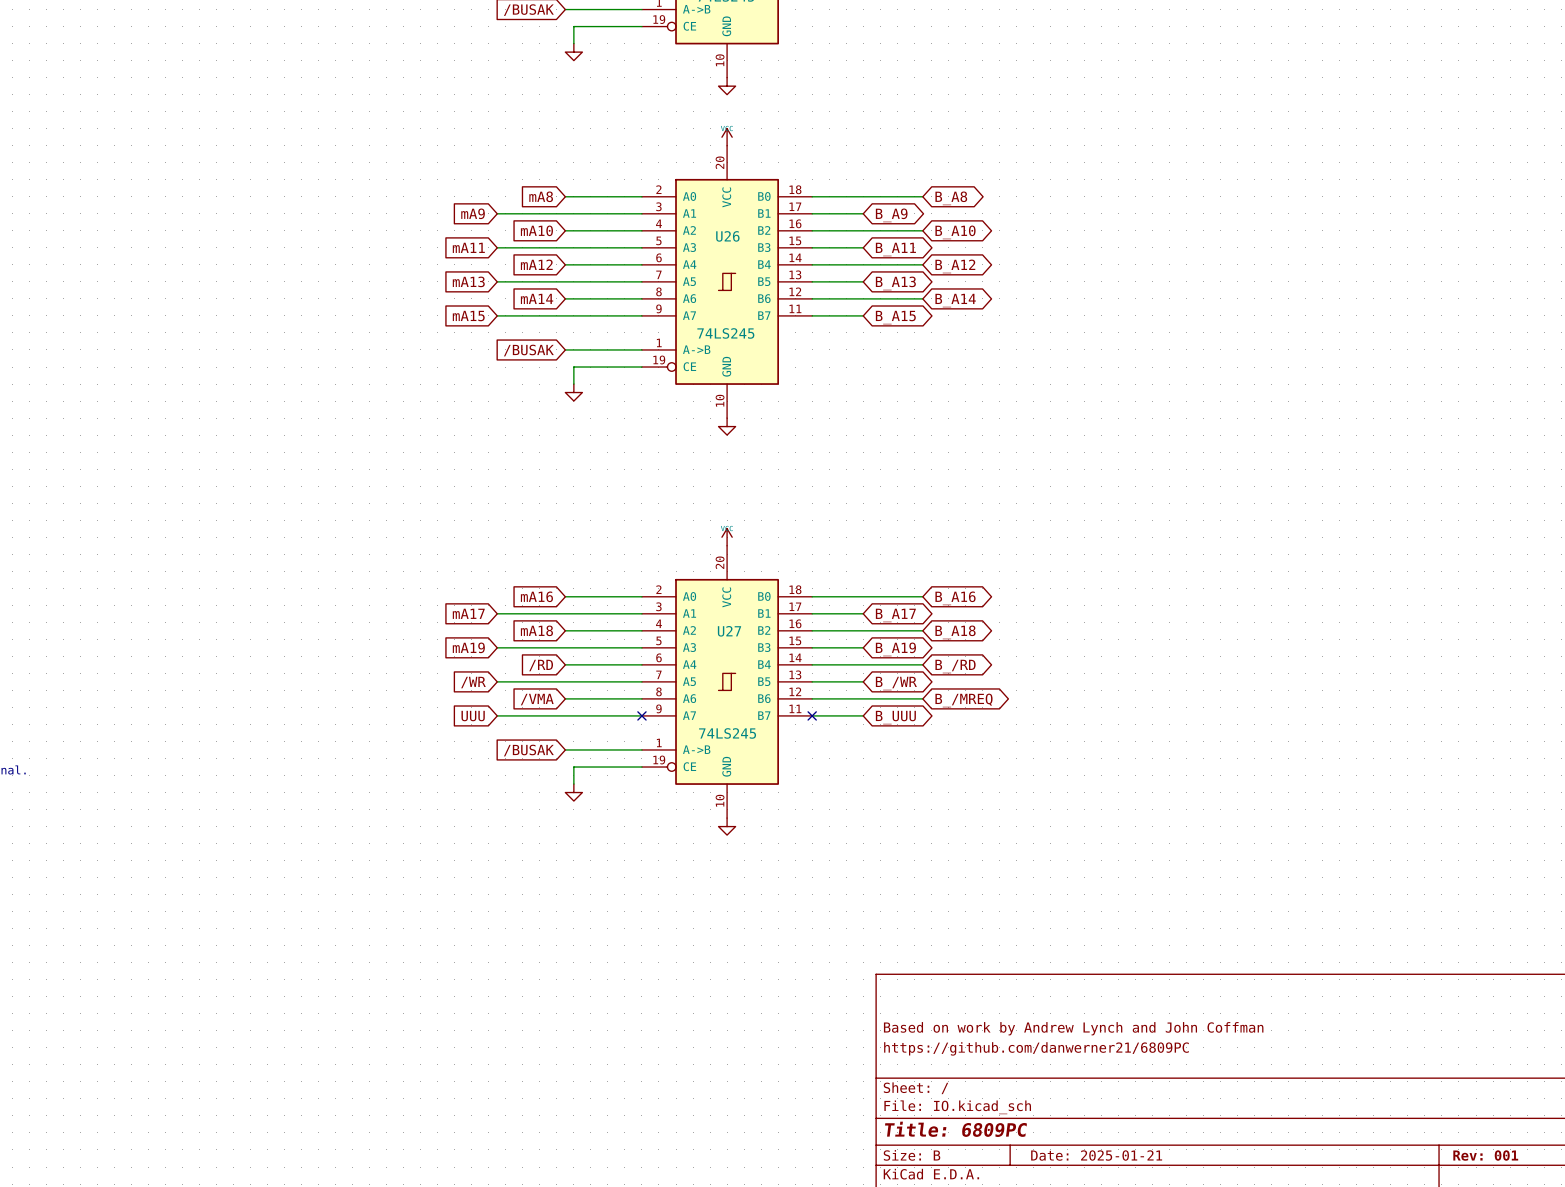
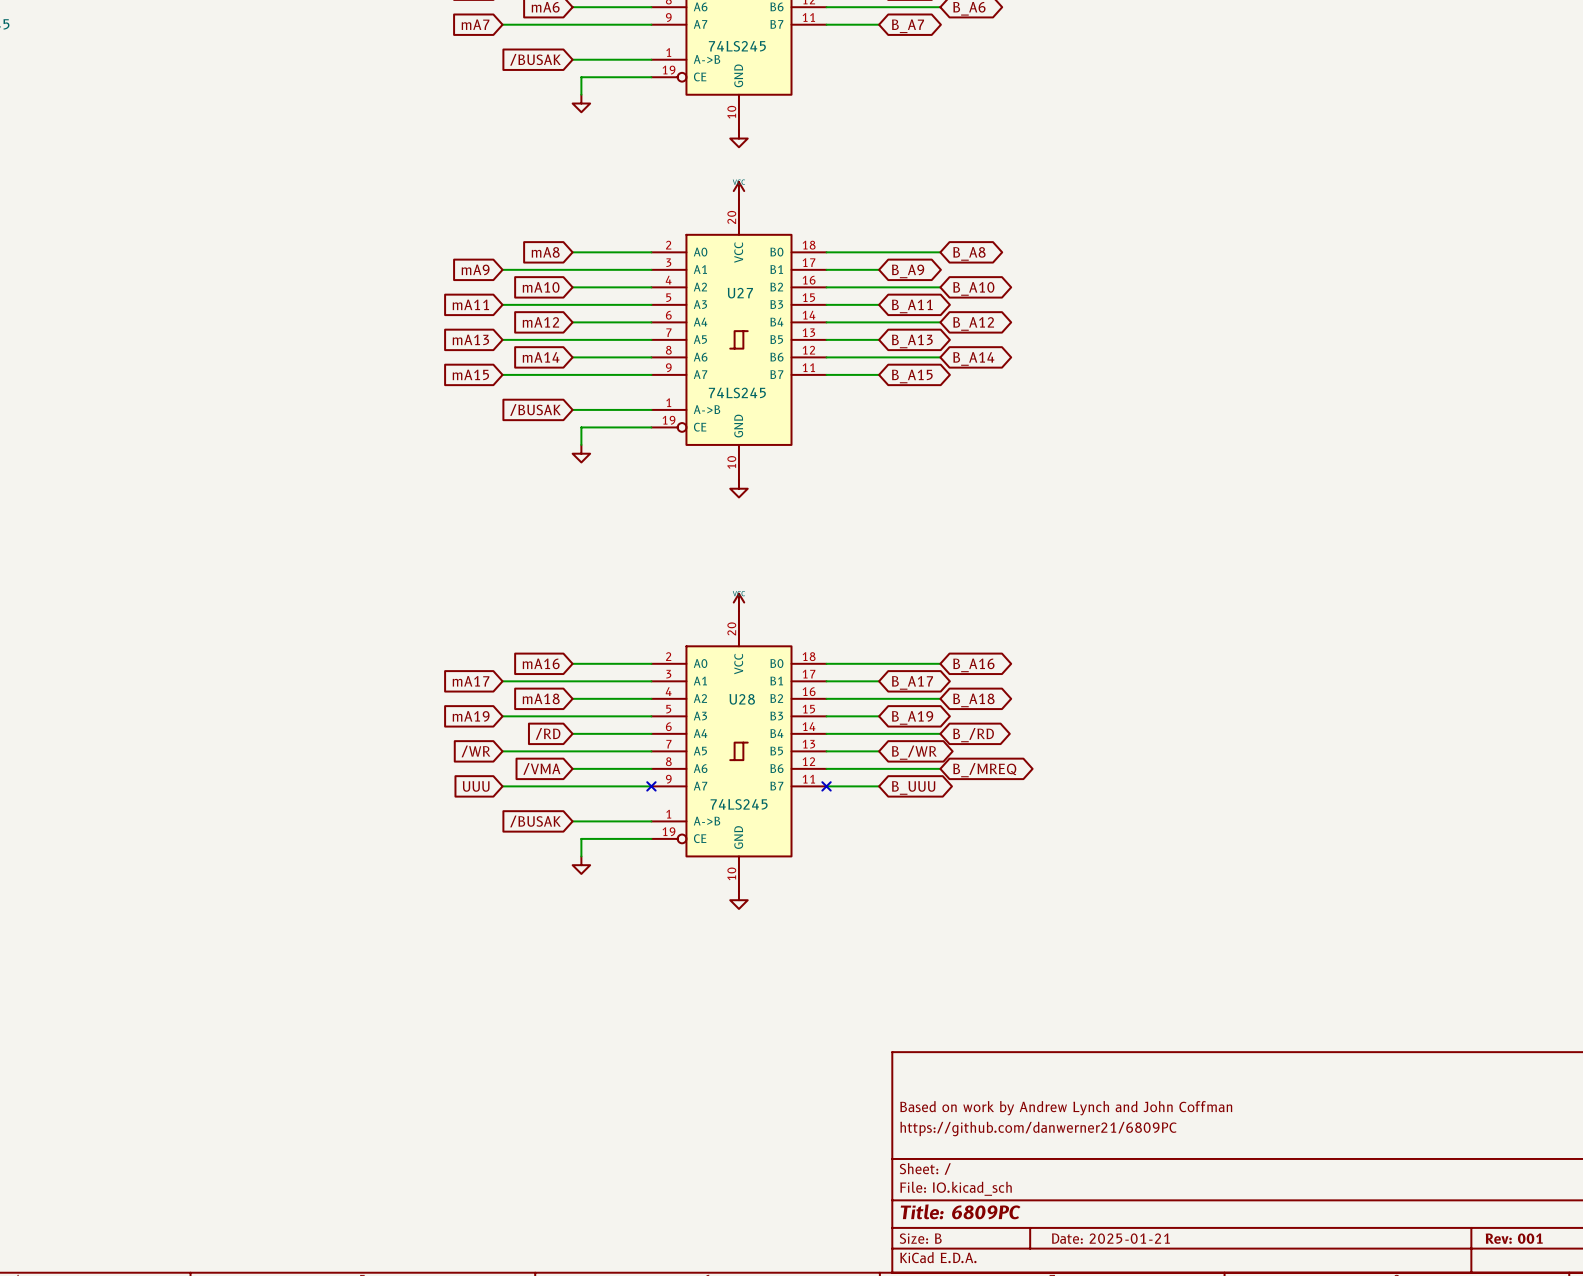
U26 name: U26 (727, 236) -> U27 (740, 293)
U27 name: U27 (729, 631) -> U28 (742, 699)

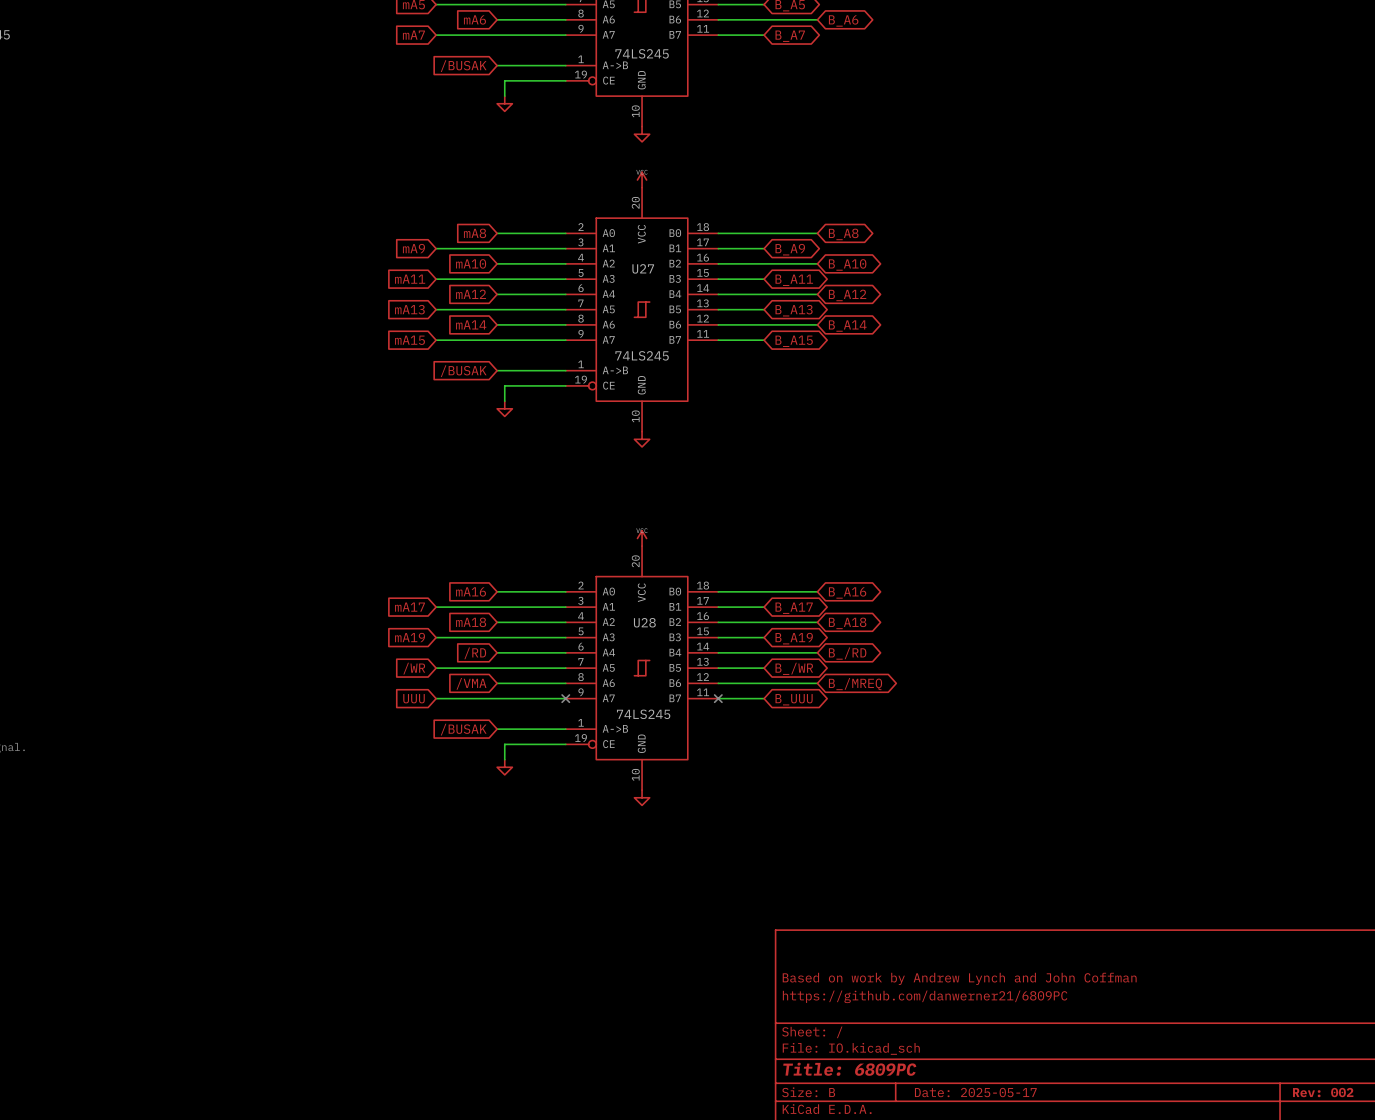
title block: Date: 2025-01-21 (1110, 1238) -> Date: 2025-05-17 (975, 1092)
title block: Rev: 001 (1514, 1238) -> Rev: 002 (1323, 1092)

